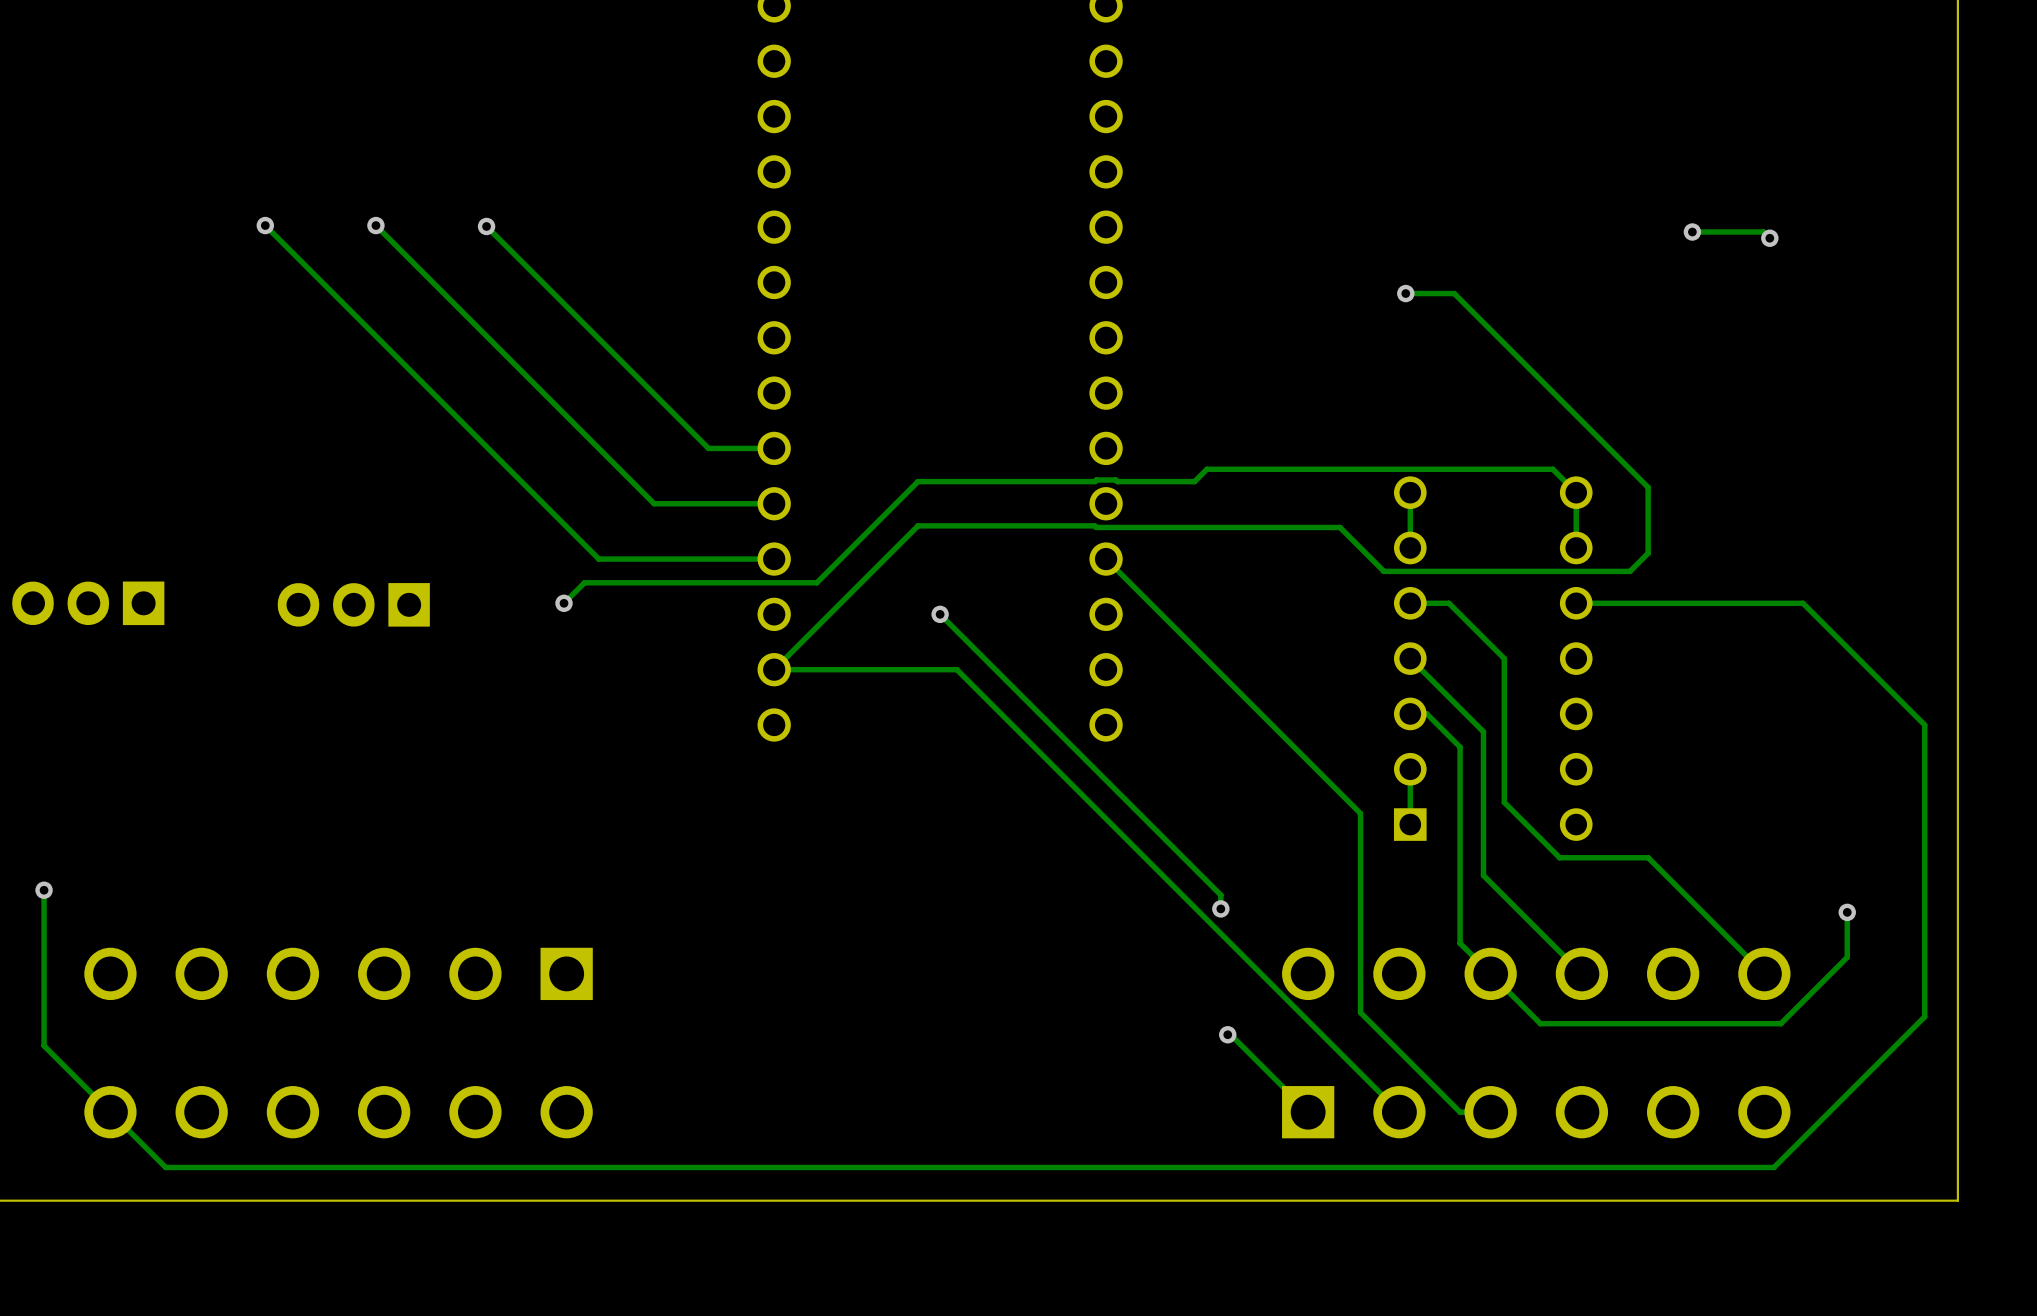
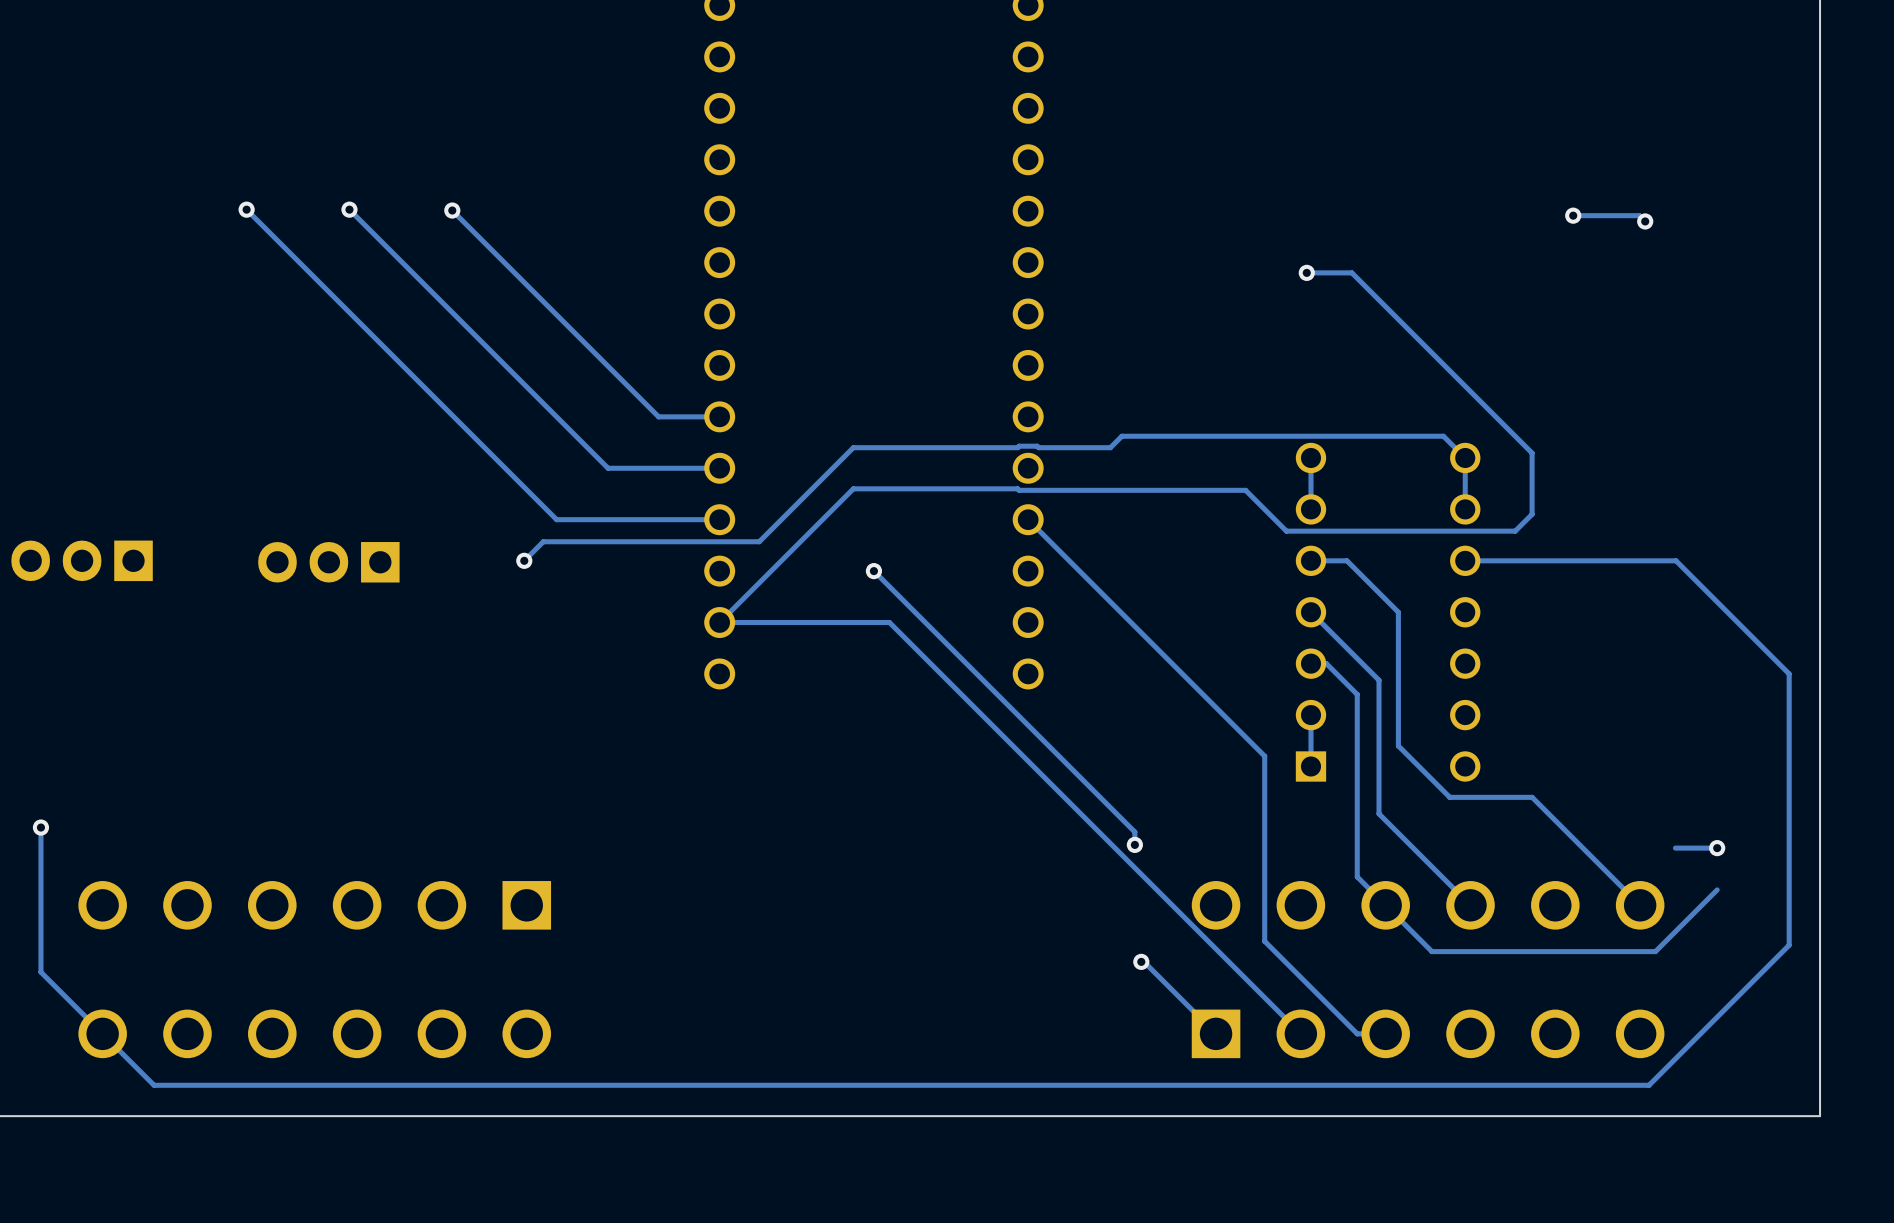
track: (1847, 912) (1847, 957) -> (1717, 848) (1675, 848)

